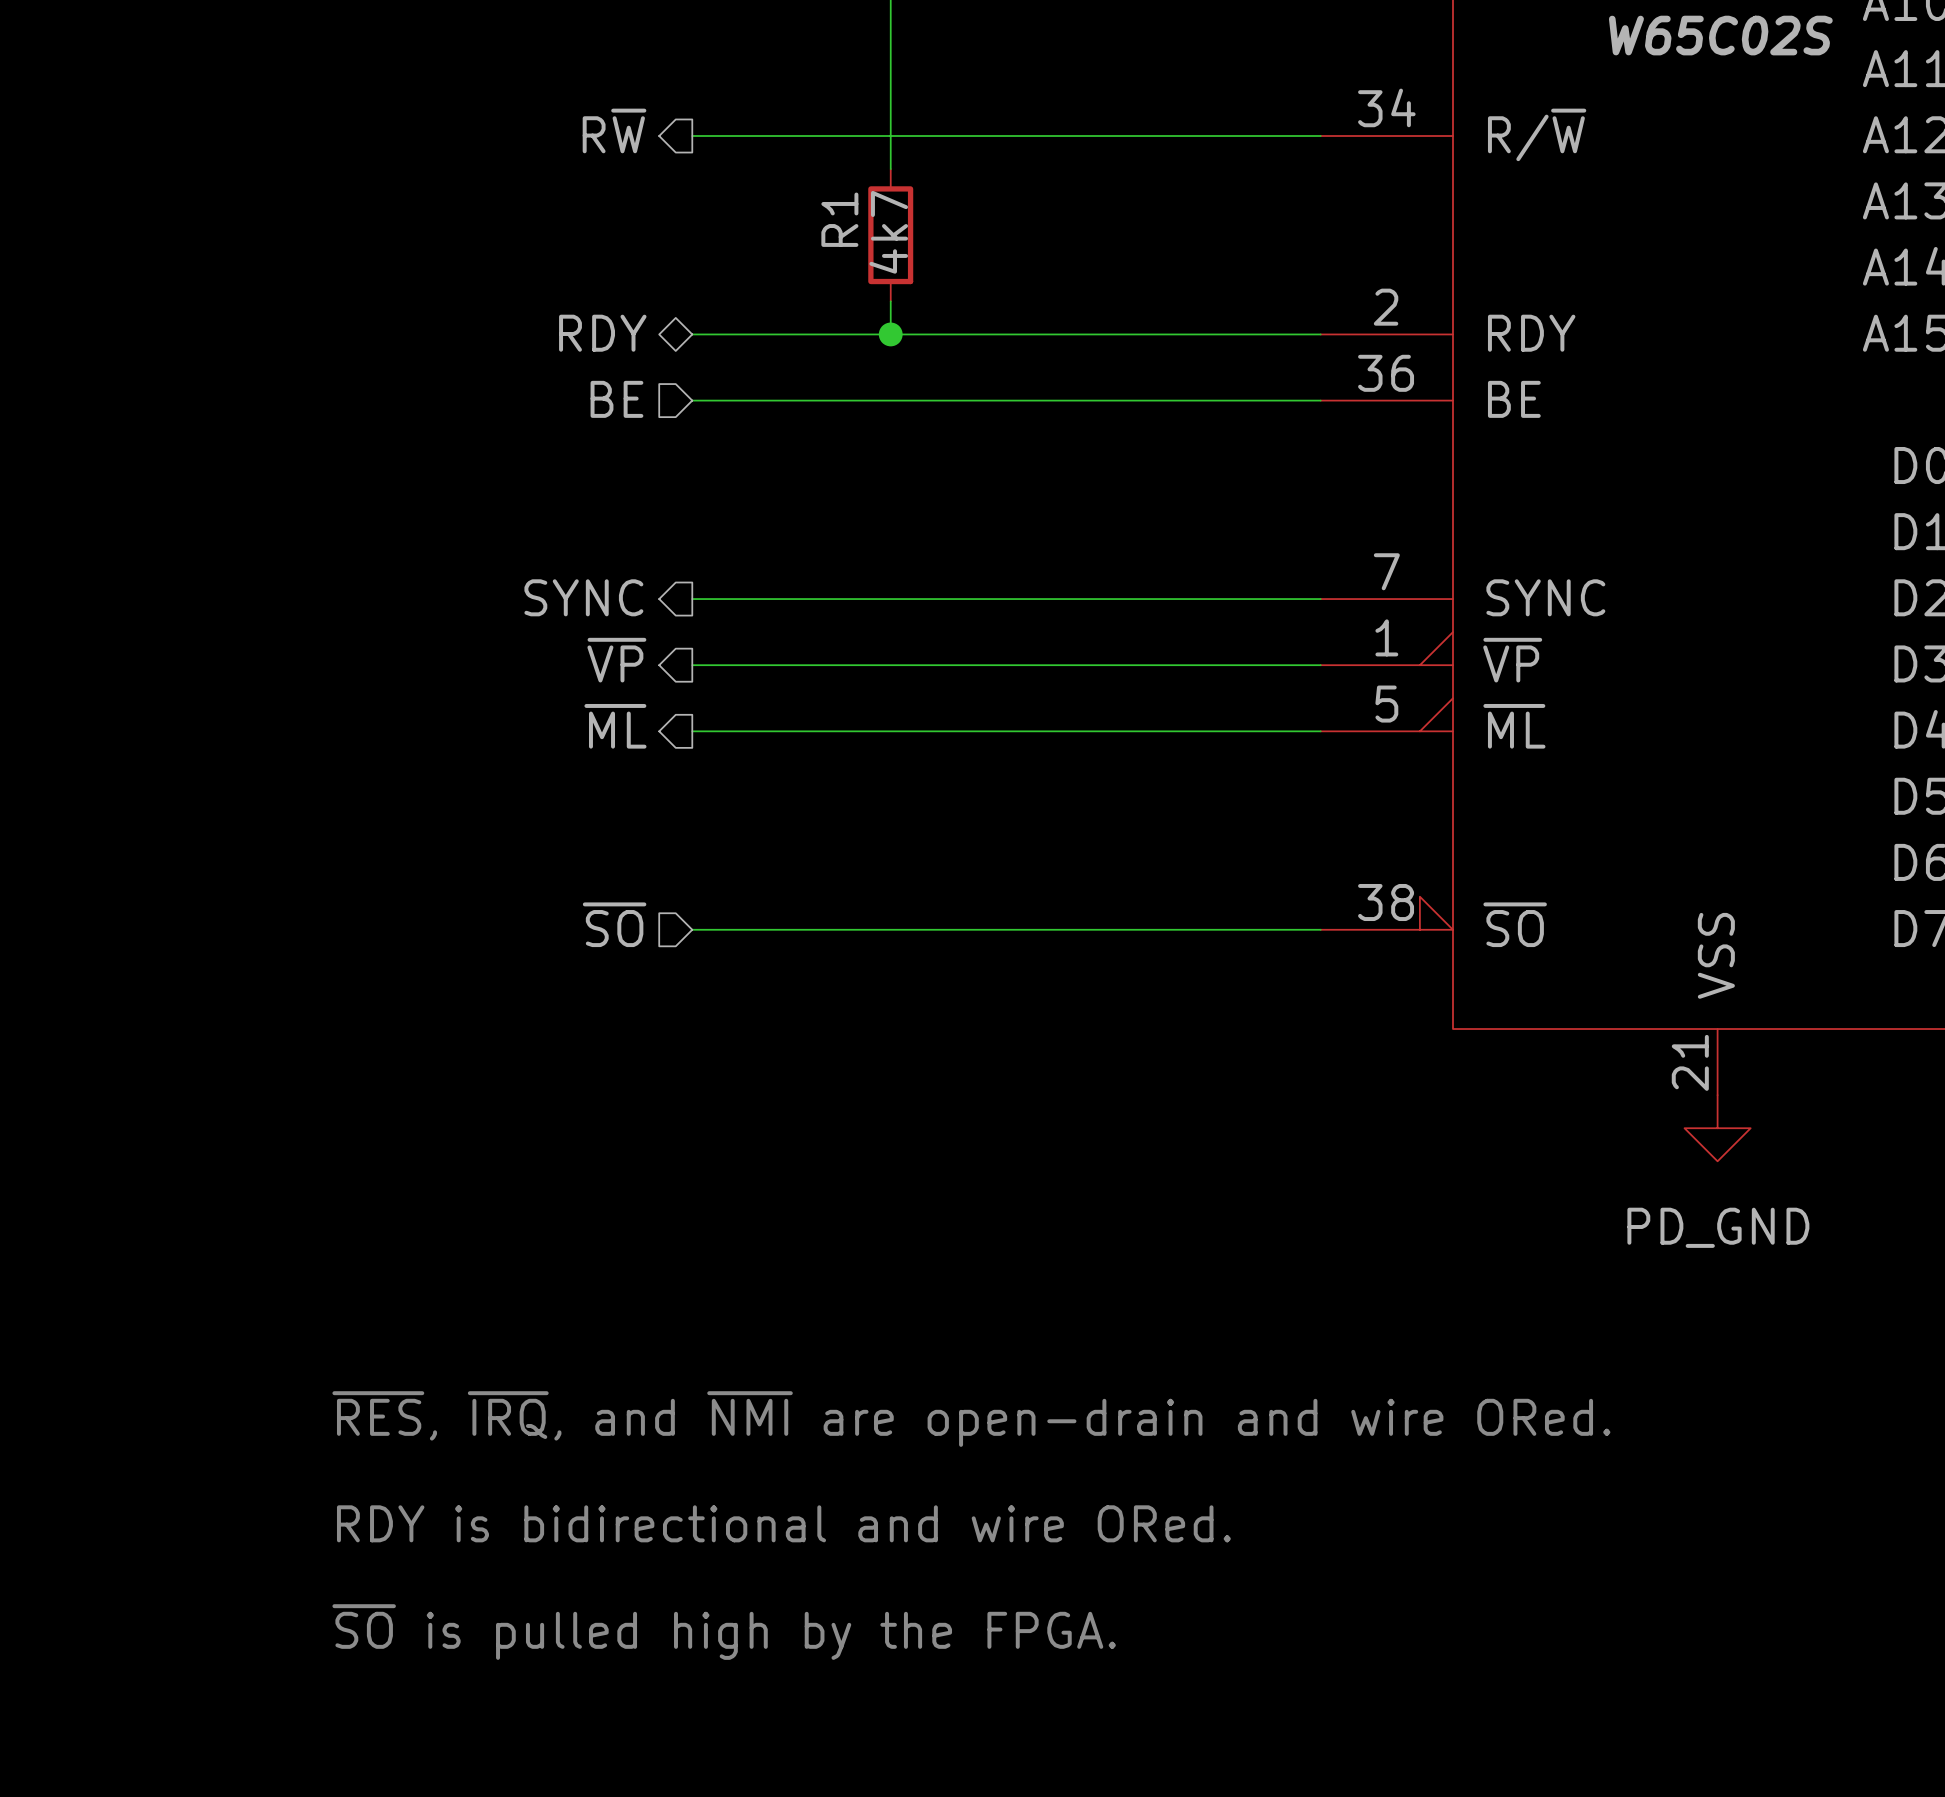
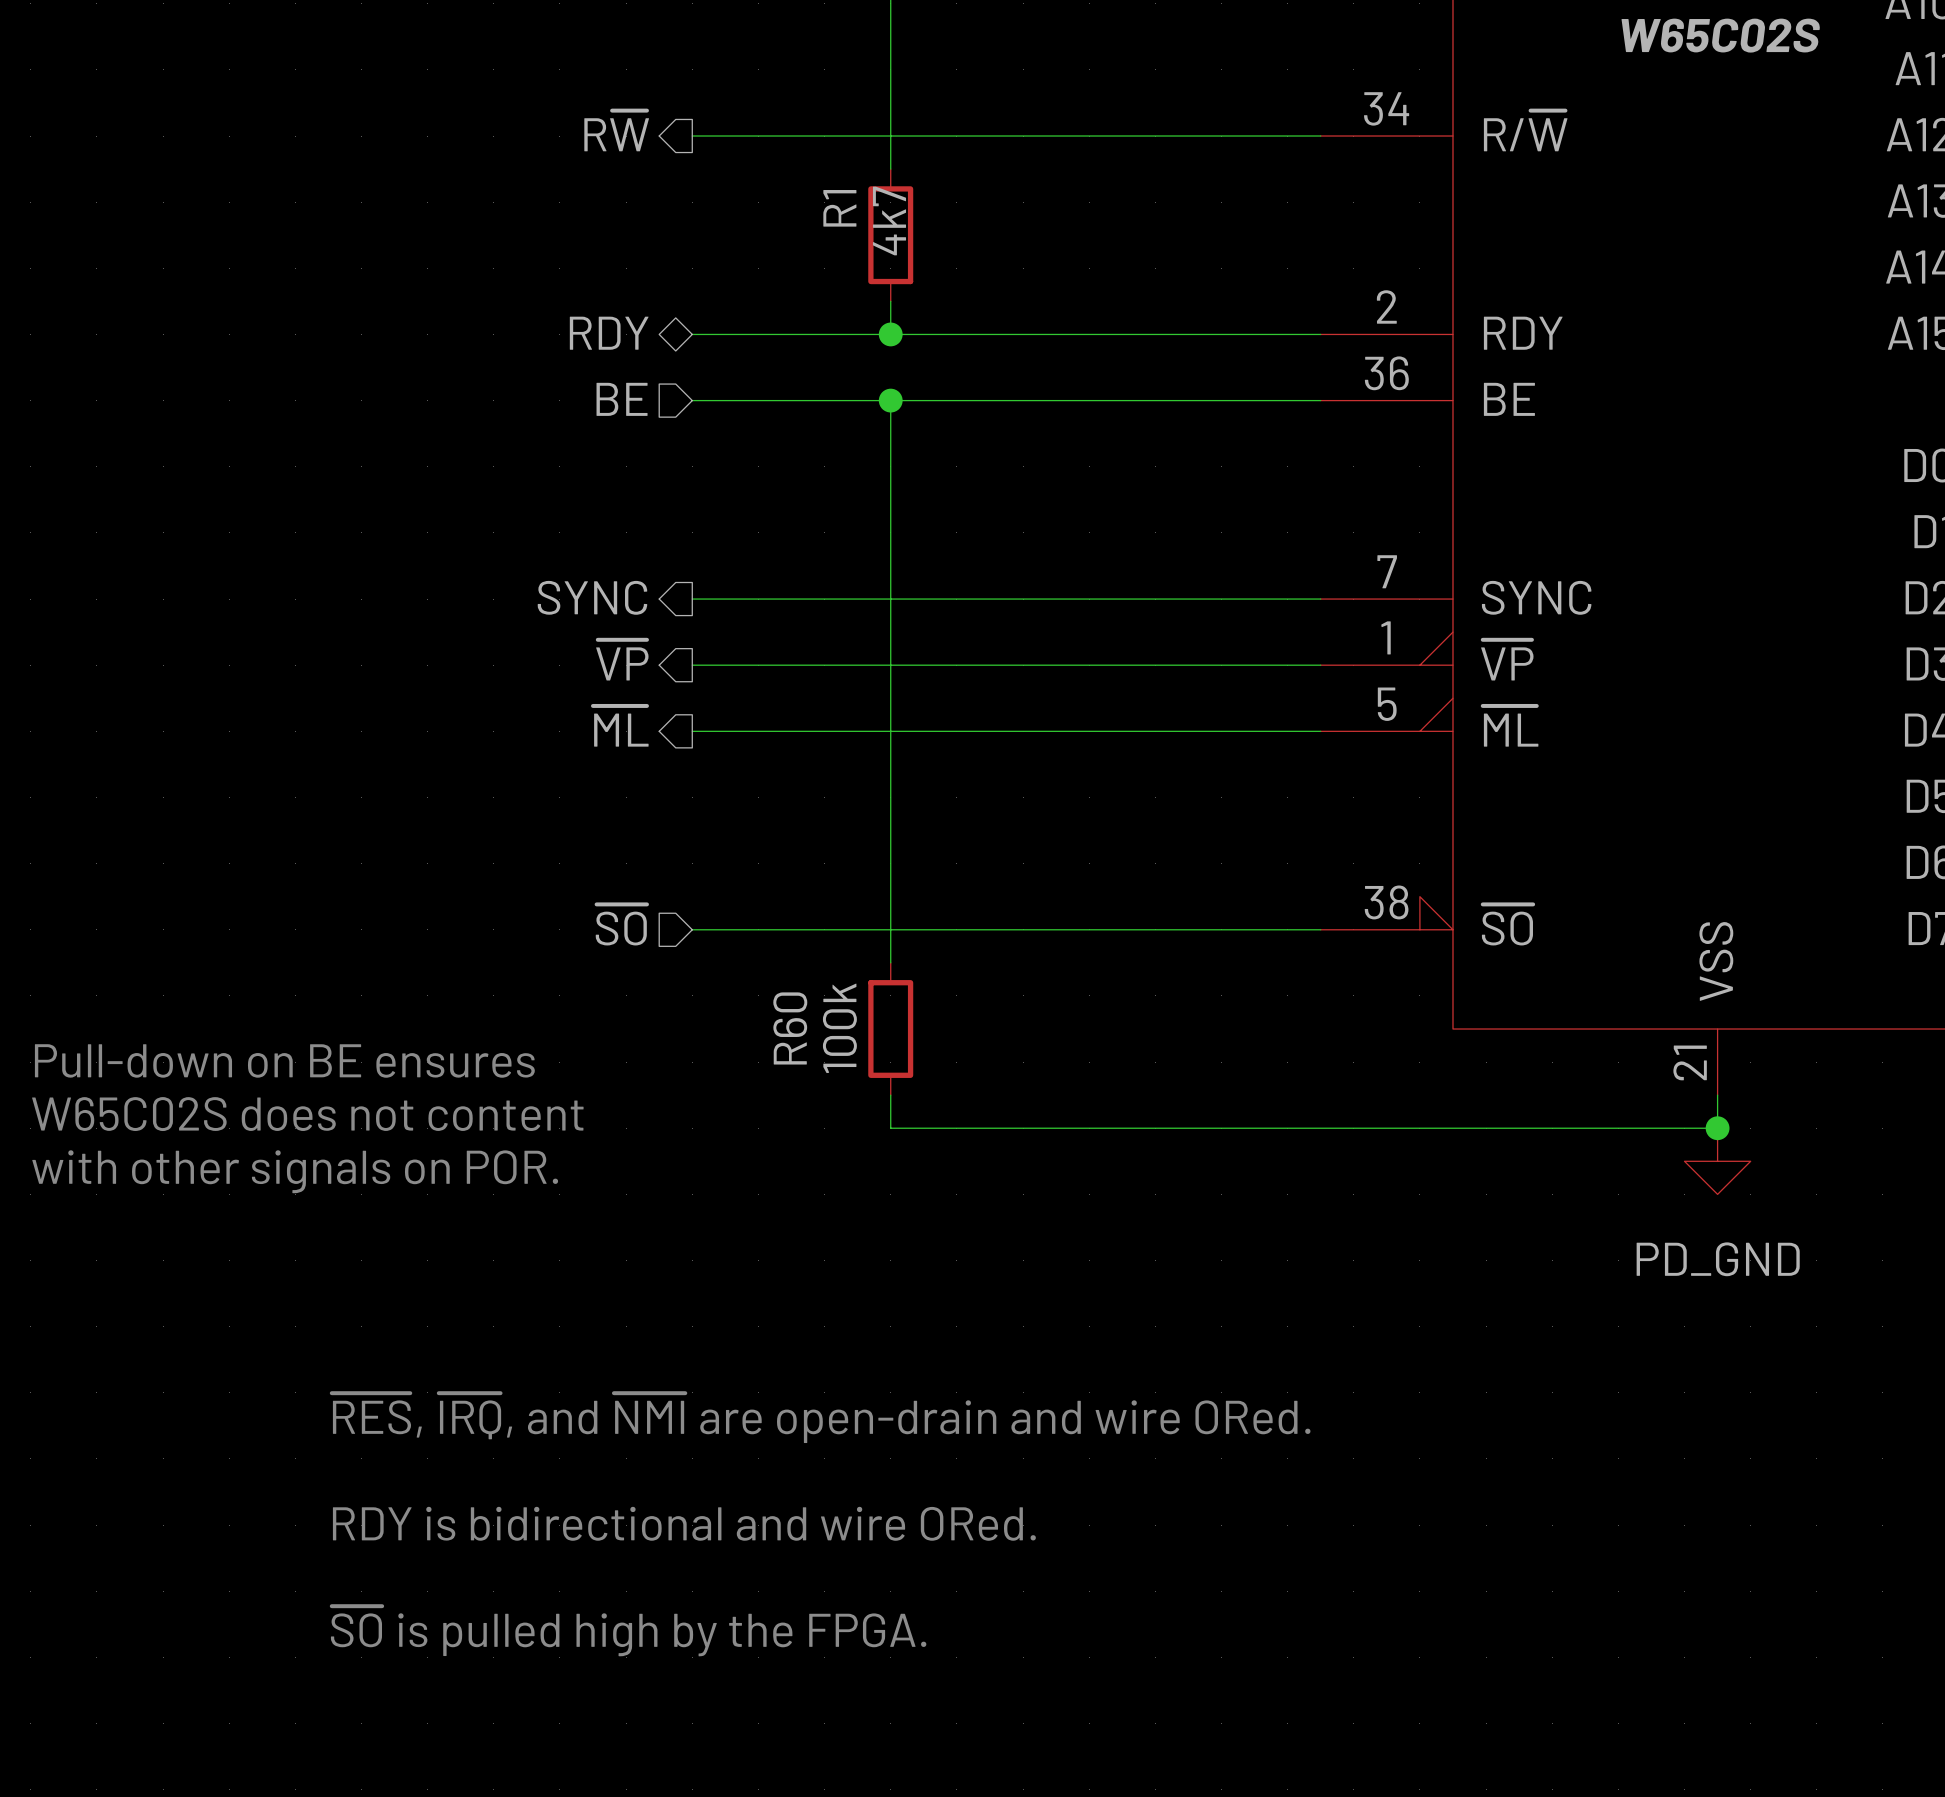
wire: none -> (890, 400) (890, 962)
junction: none -> (890, 400)
R60: none -> 100k (890, 1029)
text: none -> Pull-down on BE ensures (284, 1060)
wire: none -> (890, 1095) (890, 1128) (1717, 1128) (1717, 1095)
text: none -> W65C02S does not content (307, 1114)
power symbol position: PD_GND (1717, 1128) -> PD_GND (1717, 1161)
junction: none -> (1717, 1128)
text: none -> with other signals on POR. (295, 1171)

